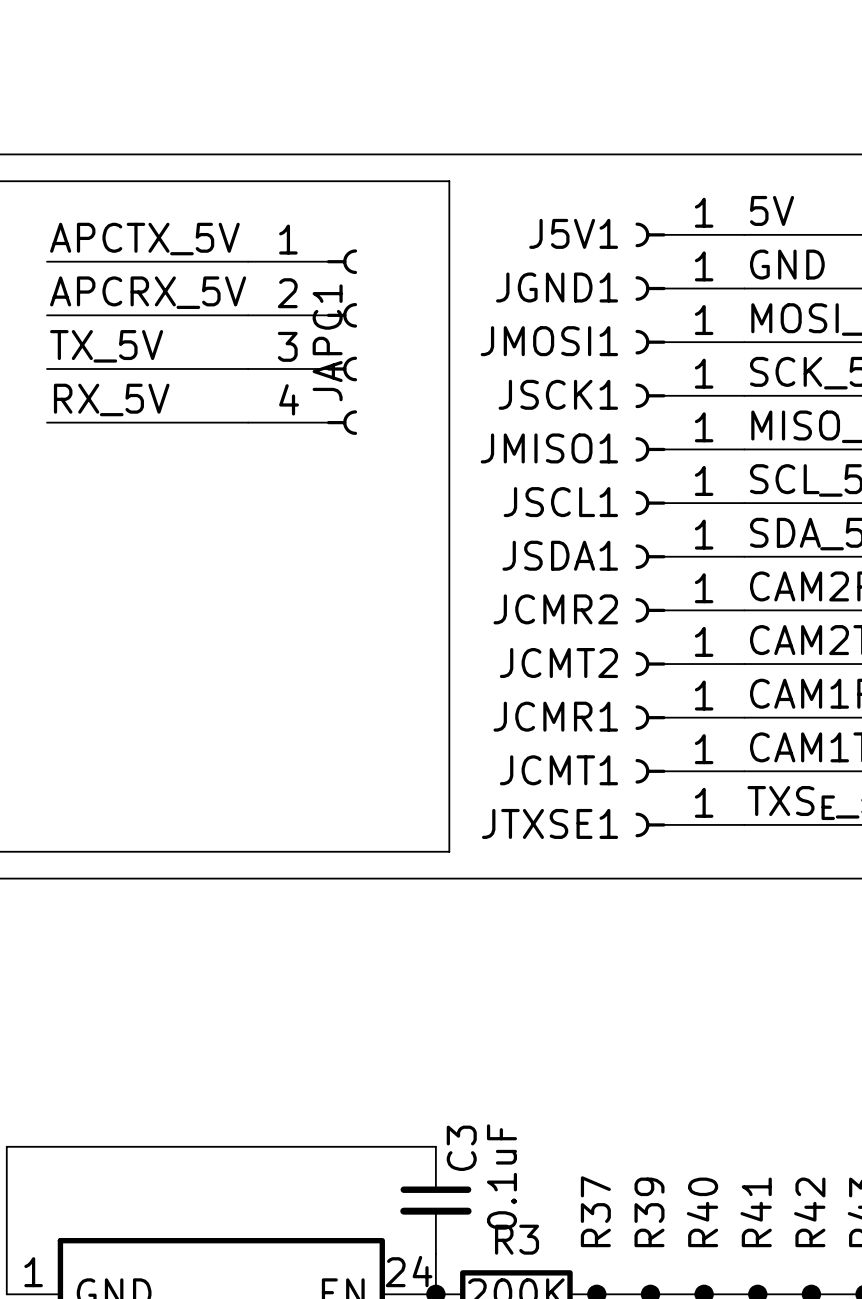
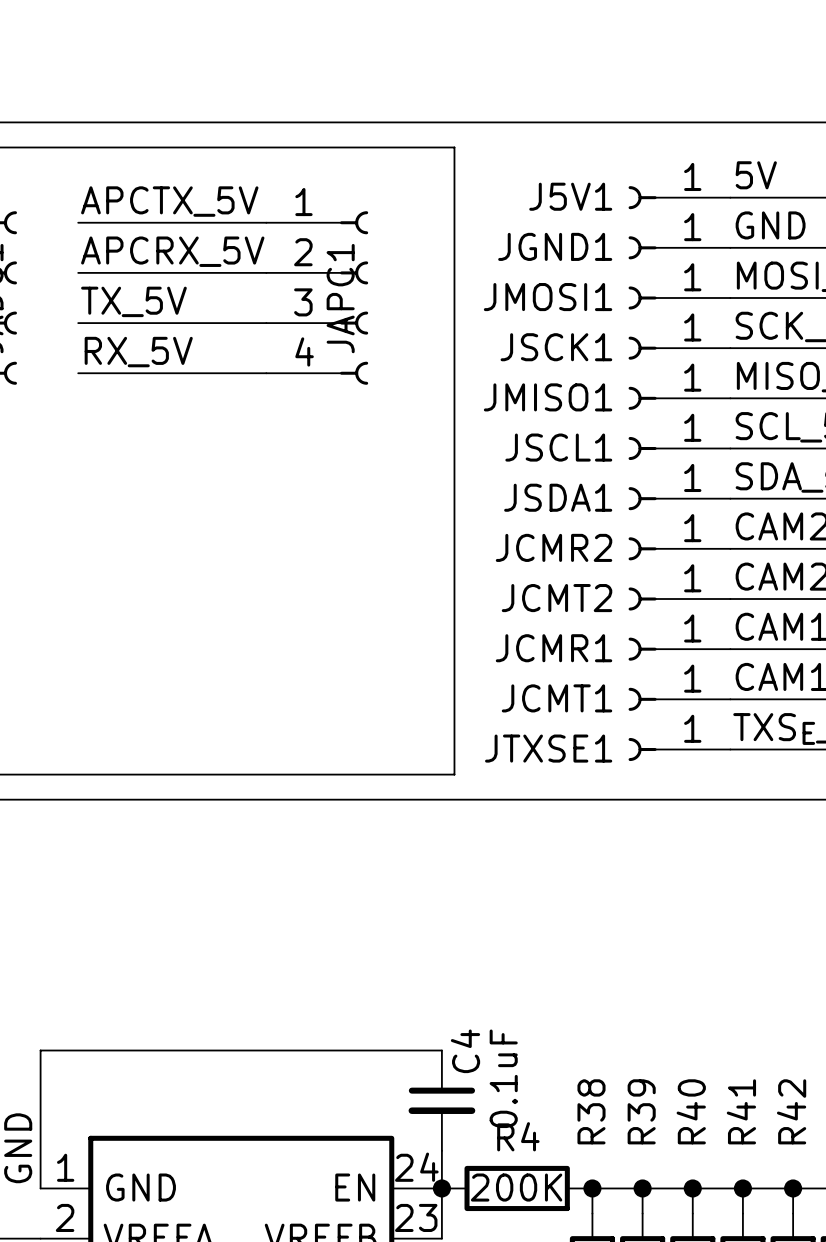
C3 name: C3 (461, 1148) -> C4 (465, 1051)
R37 name: R37 (595, 1211) -> R38 (591, 1111)
R3 name: R3 (517, 1239) -> R4 (518, 1136)

